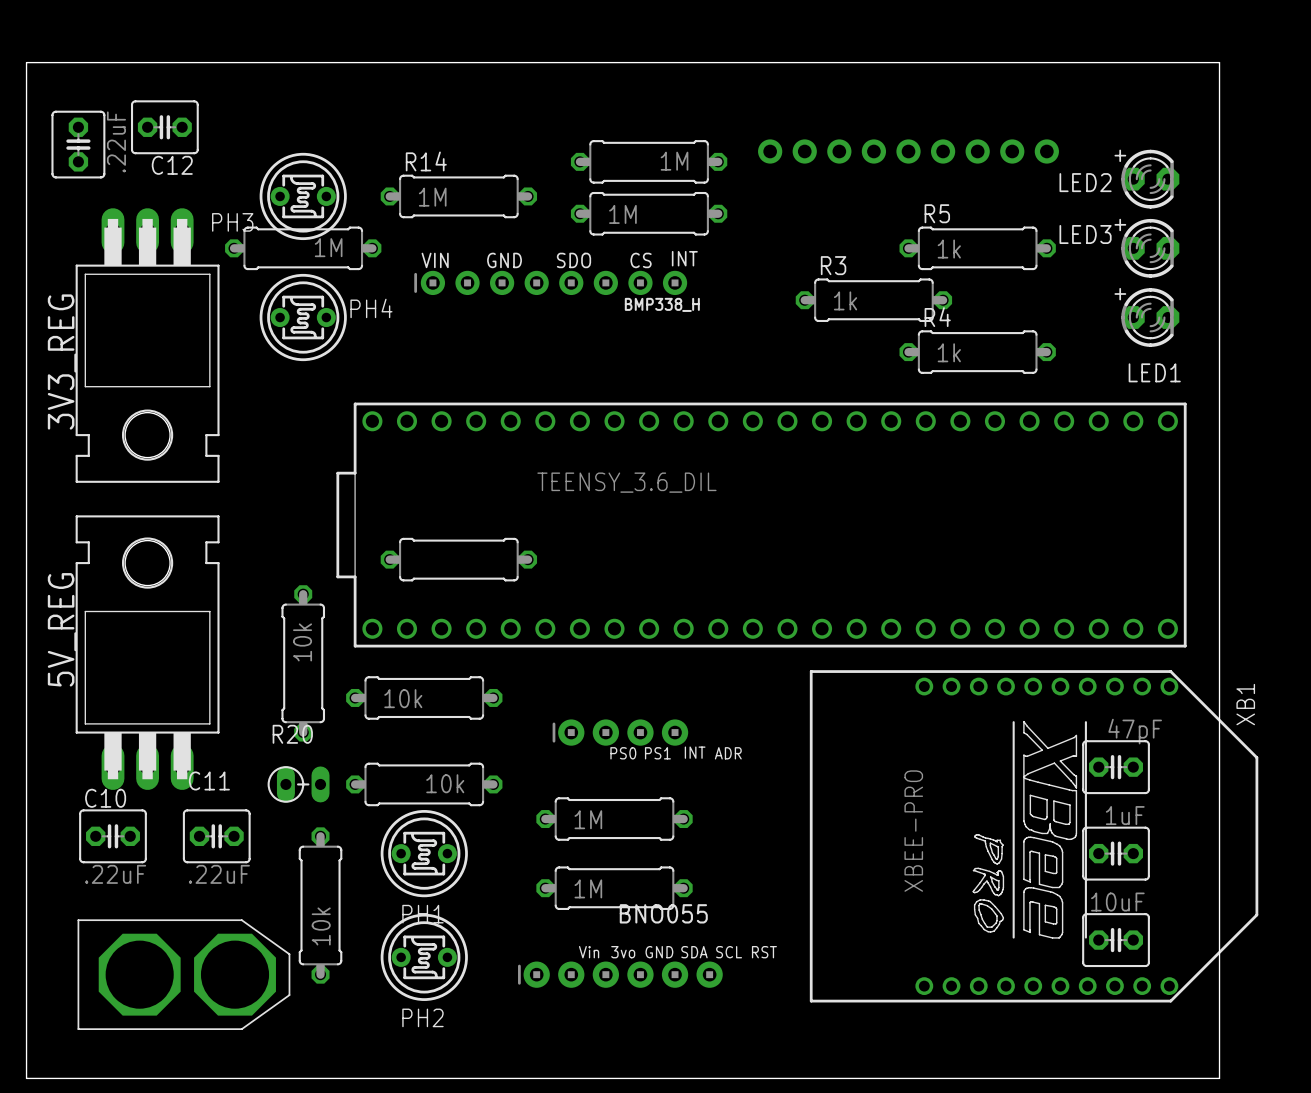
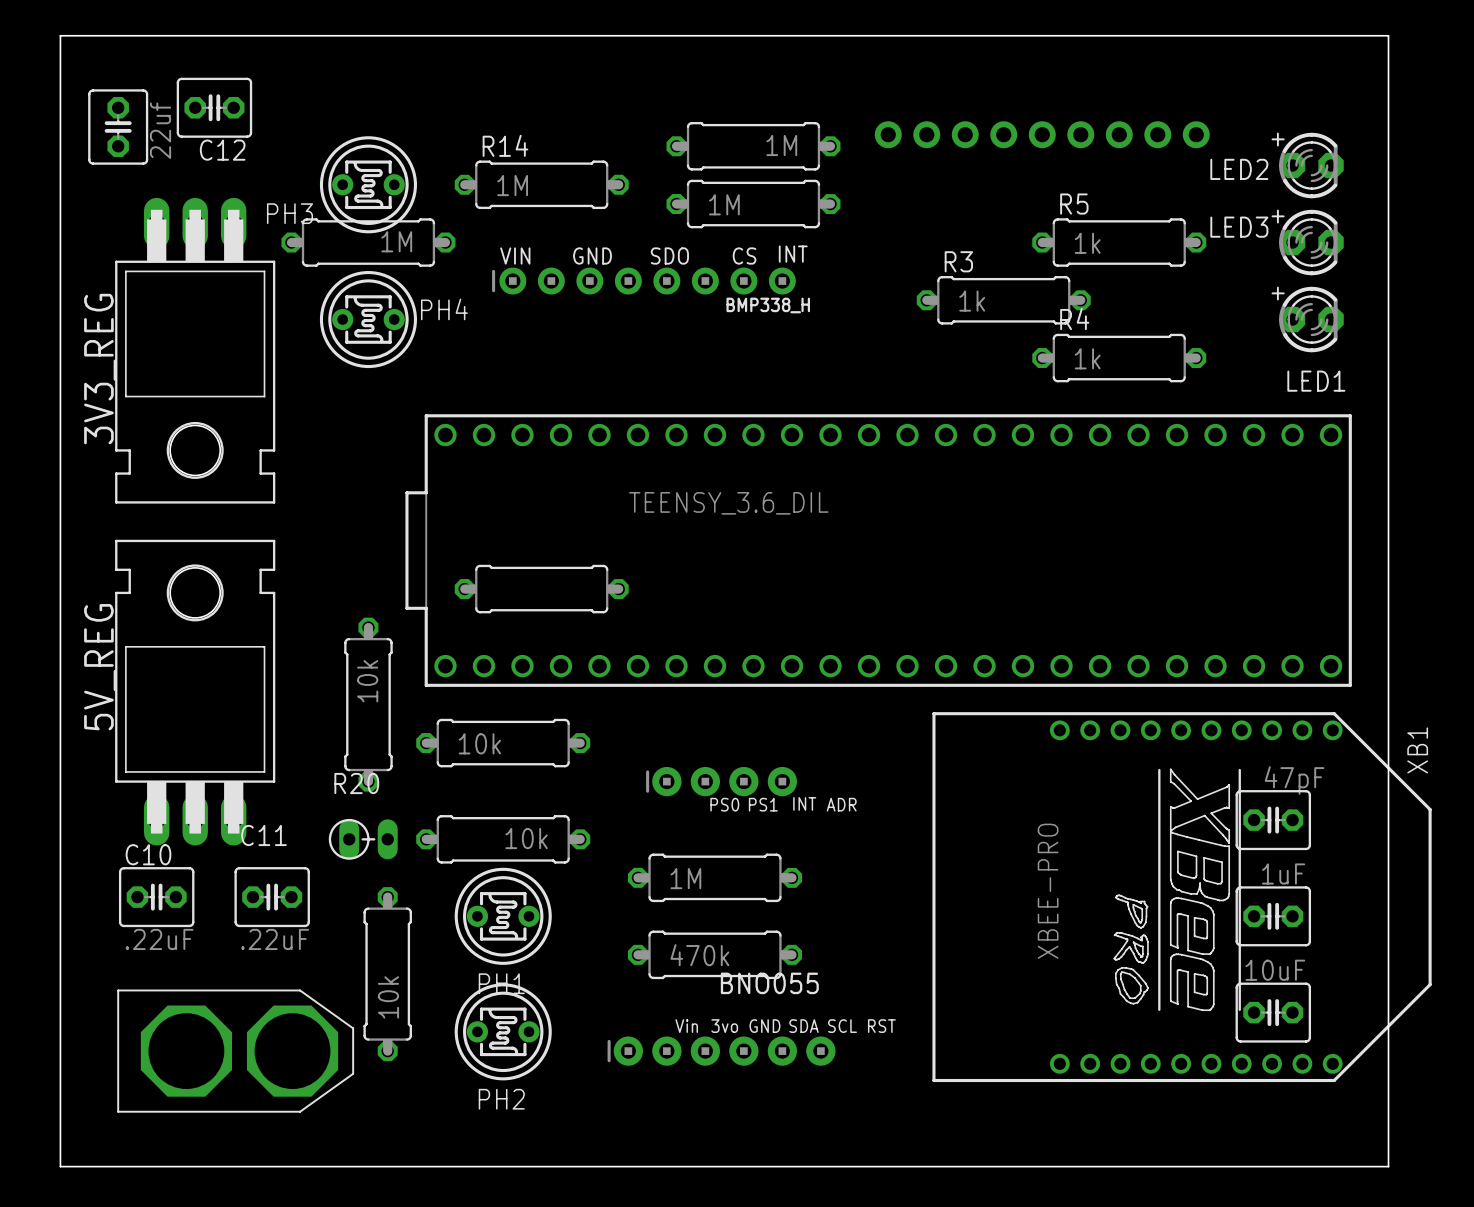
part value: .22uF (116, 141) -> 22uf (160, 130)
part value: 1M (588, 888) -> 470k (699, 955)

